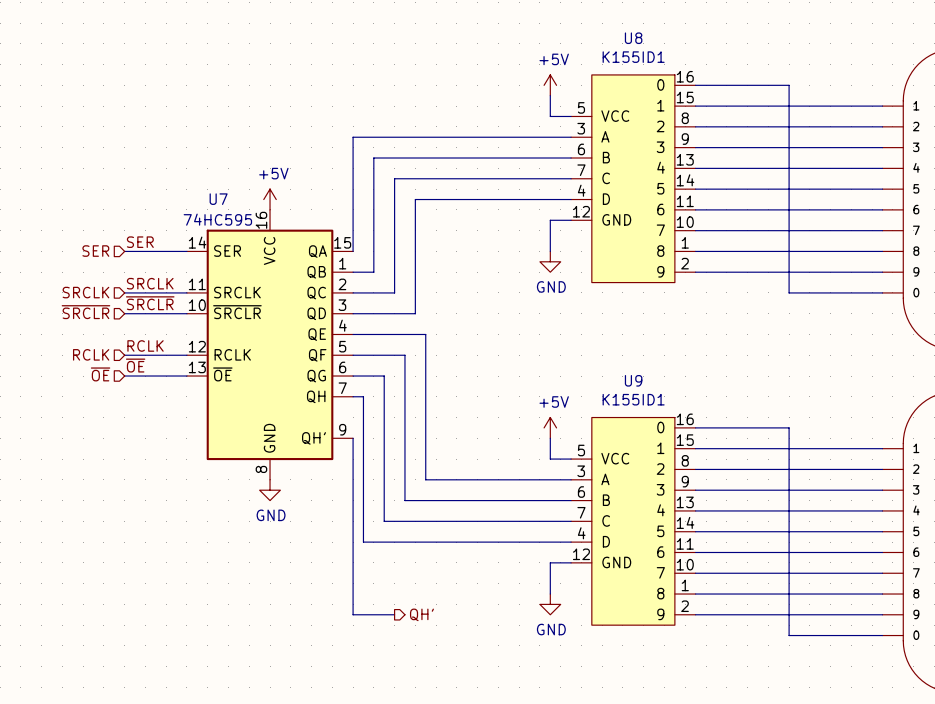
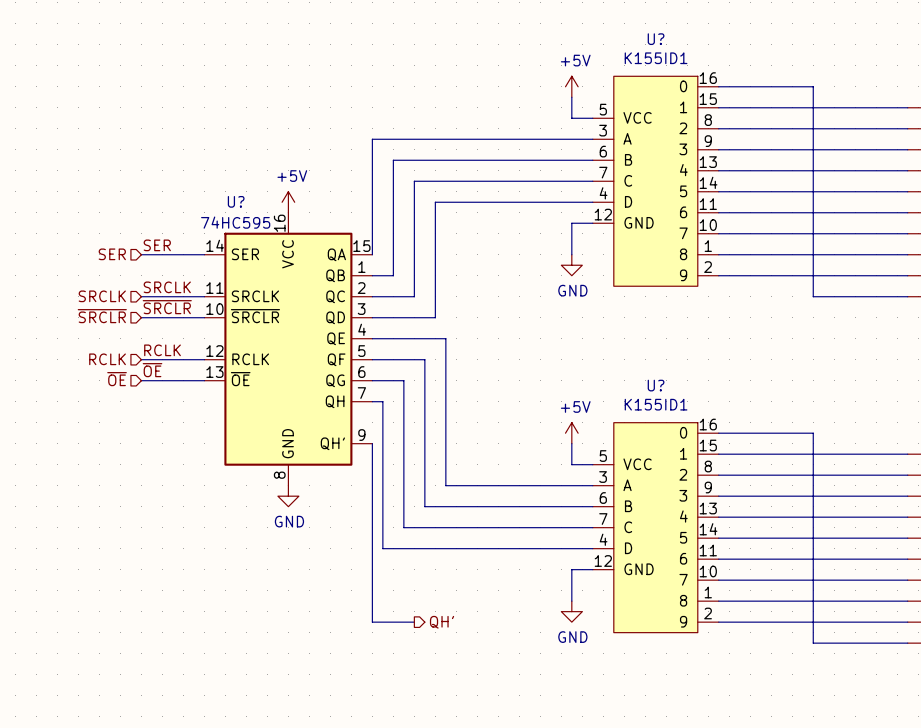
U8 name: U8 (633, 38) -> U? (656, 39)
U7 name: U7 (218, 199) -> U? (236, 201)
U9 name: U9 (633, 380) -> U? (656, 385)

